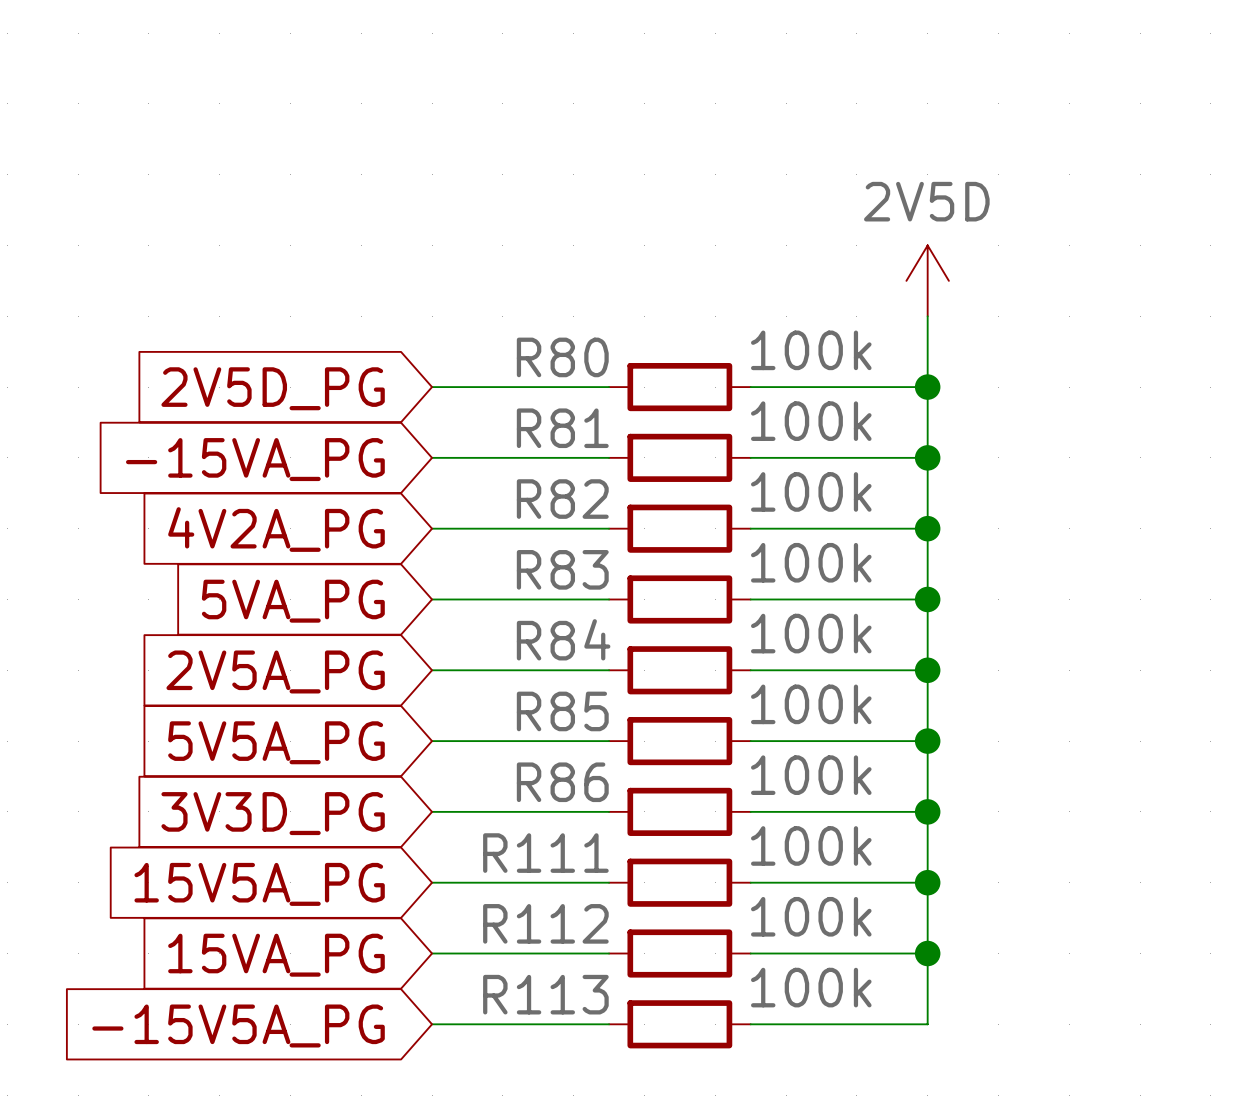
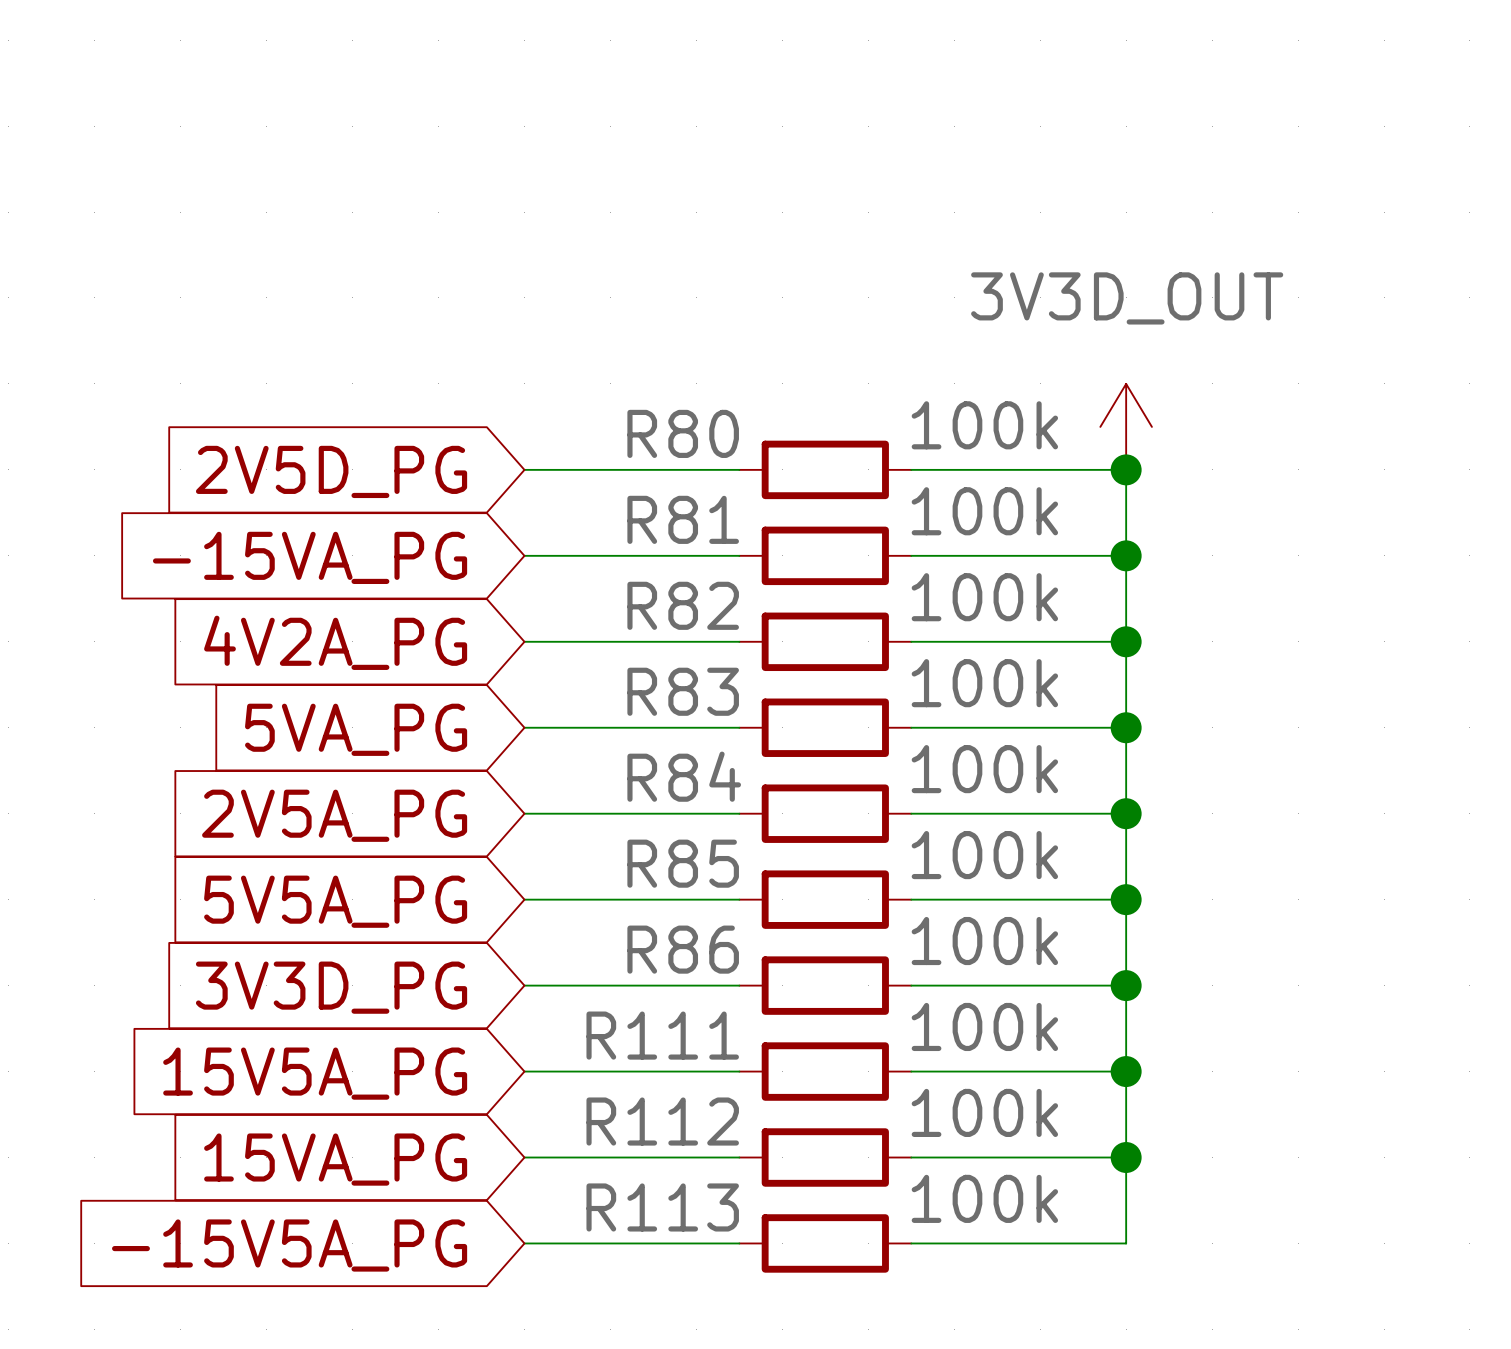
power symbol: 2V5D (927, 280) -> none
power symbol: none -> 3V3D_OUT (1126, 426)

